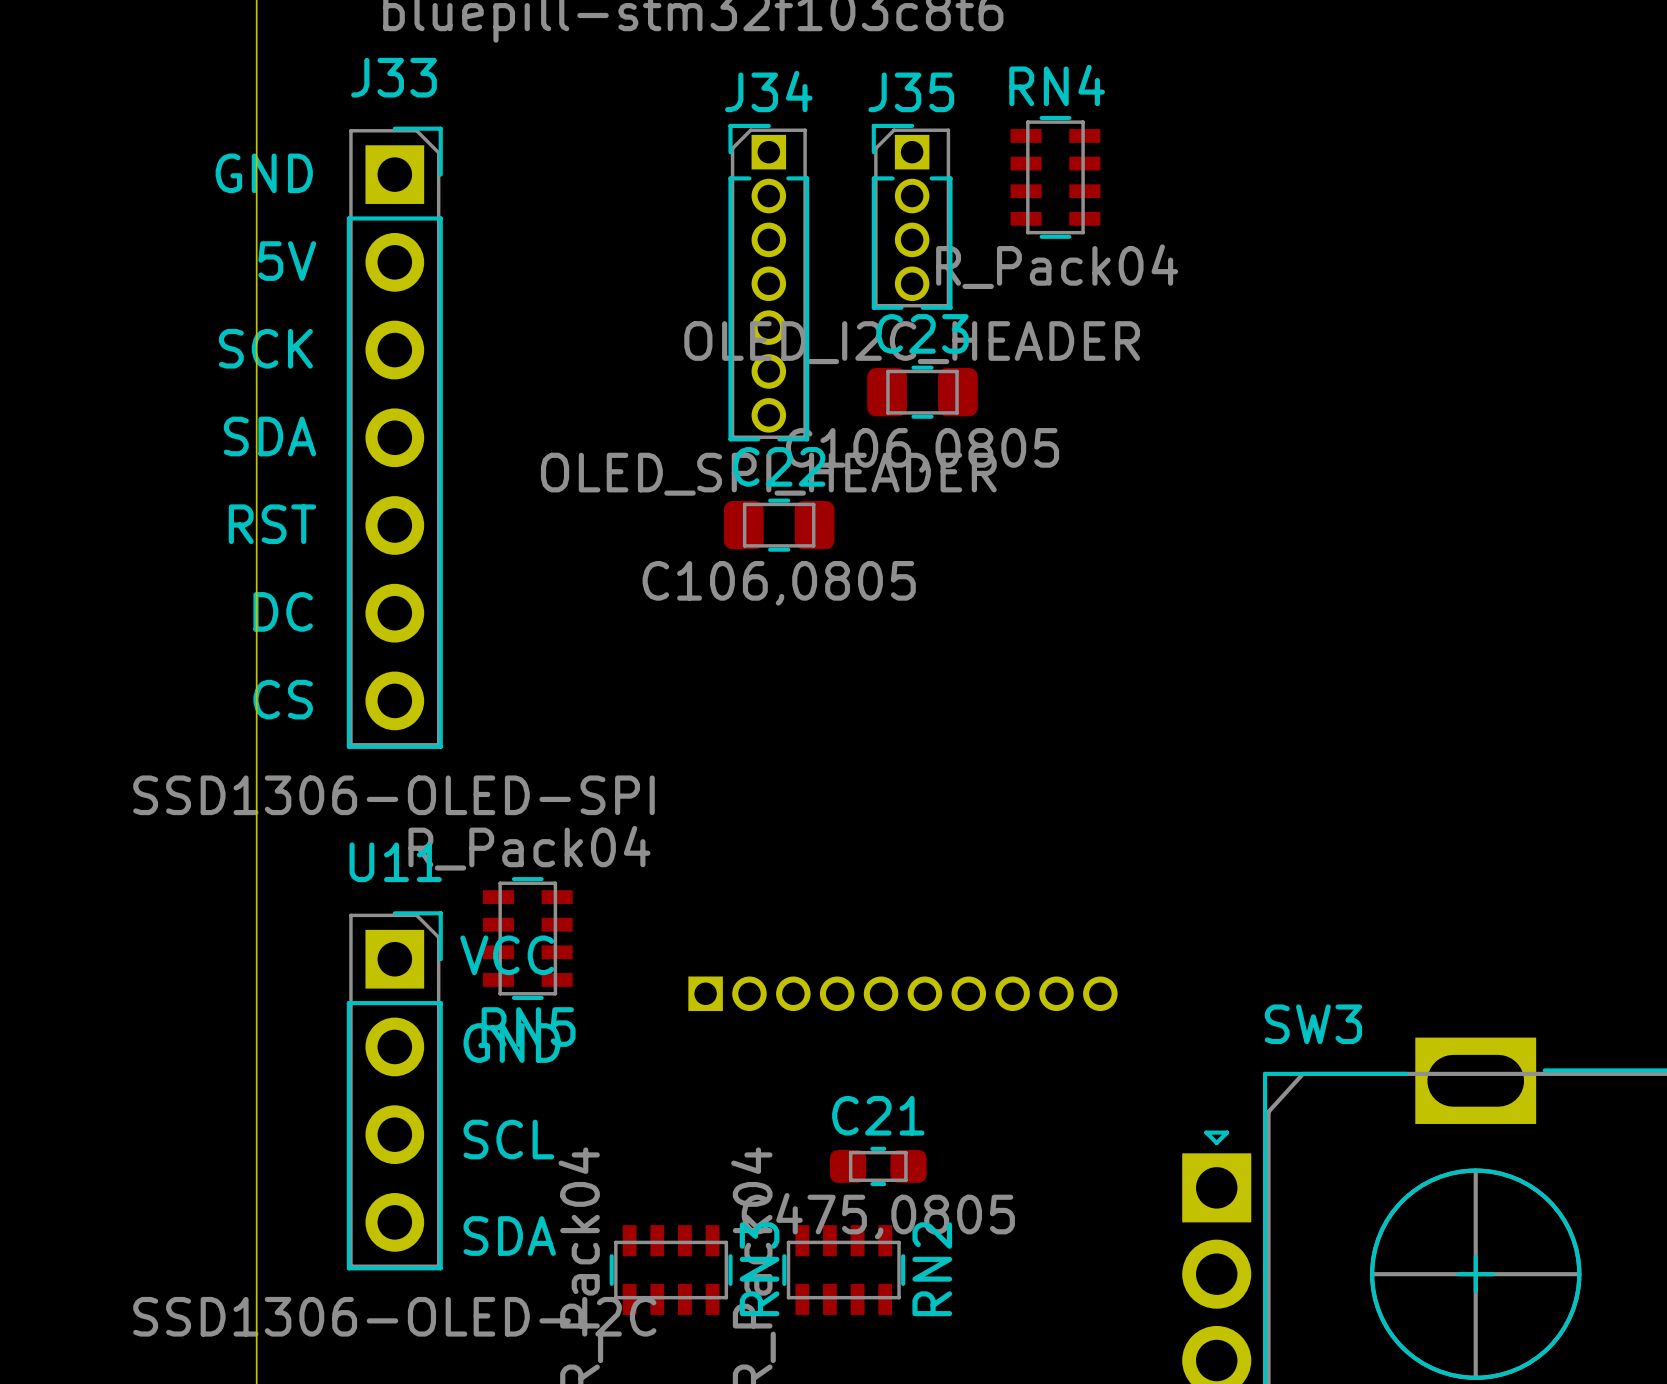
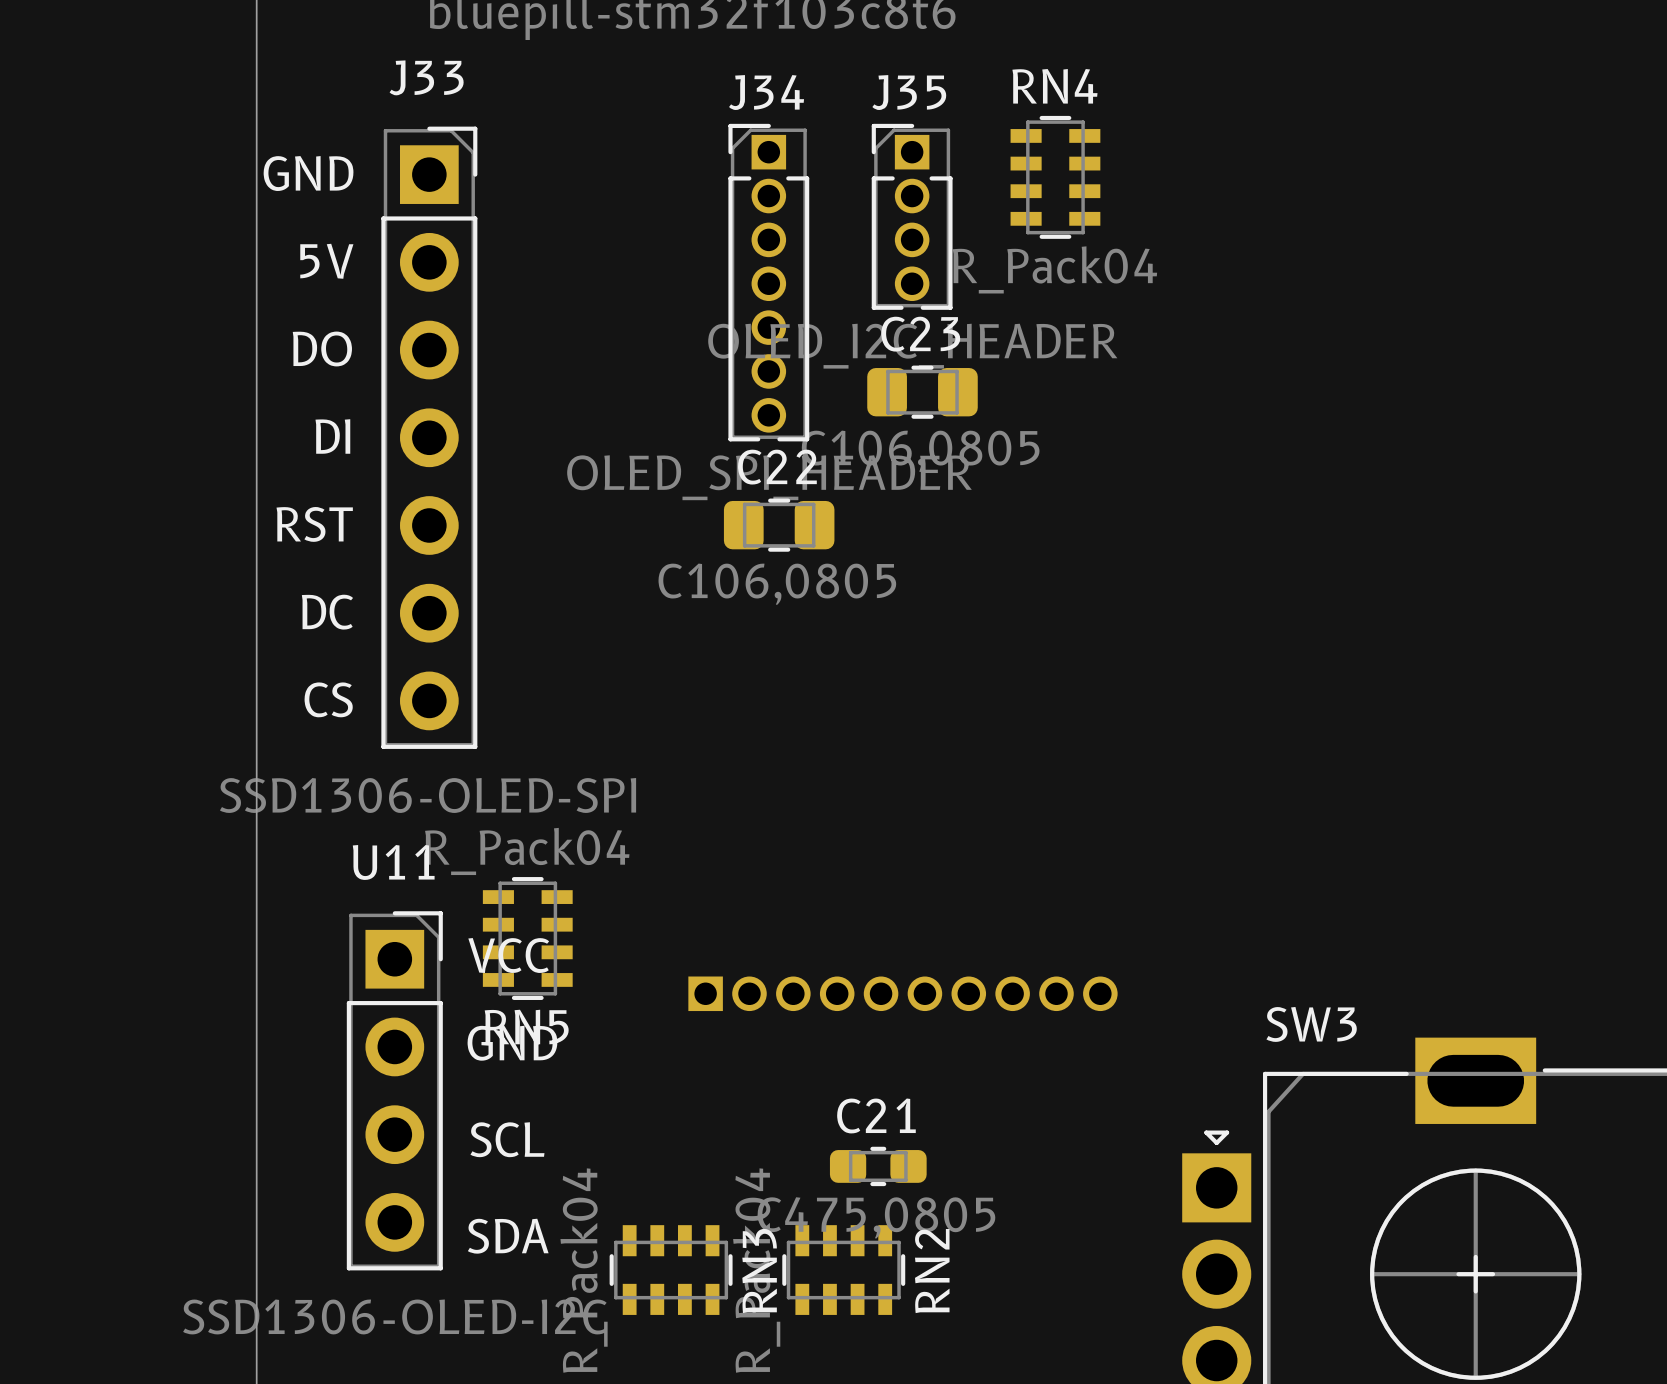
J33 text: SCK (265, 348) -> DO (322, 348)
J33 text: SDA (269, 436) -> DI (332, 436)
J33 position: (394, 437) -> (429, 437)

